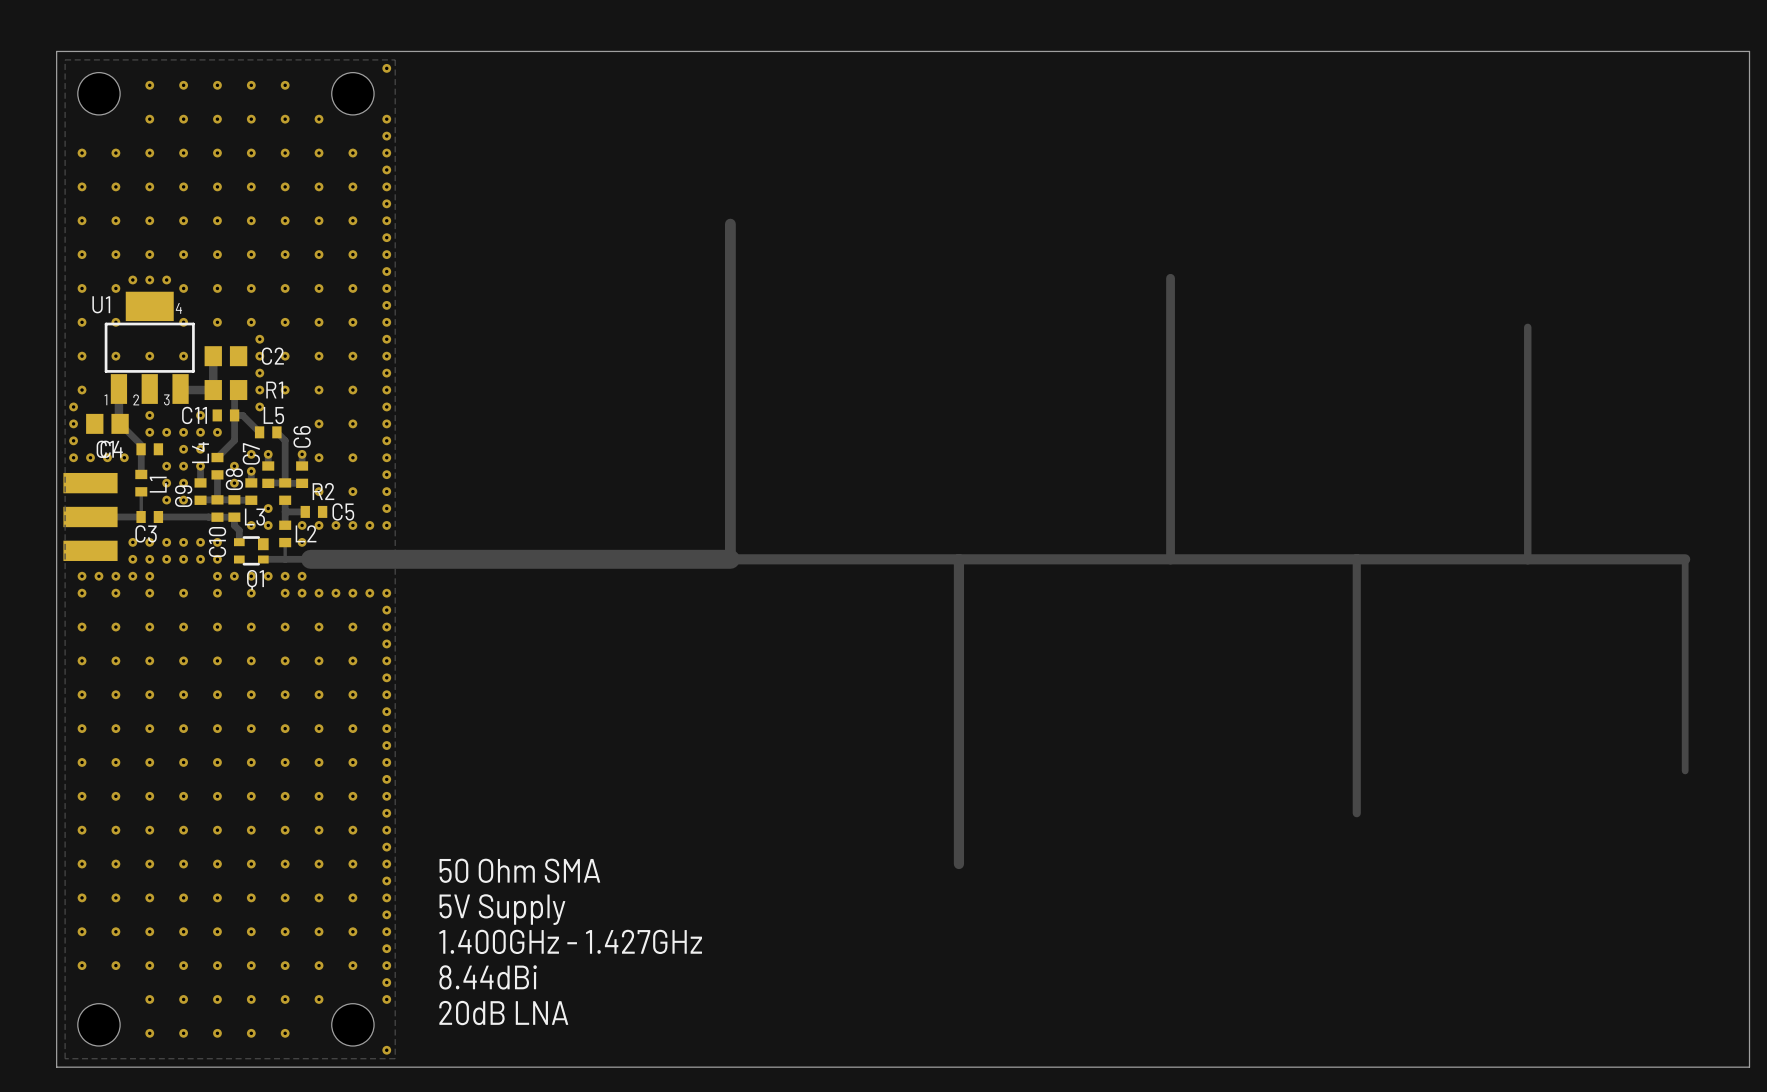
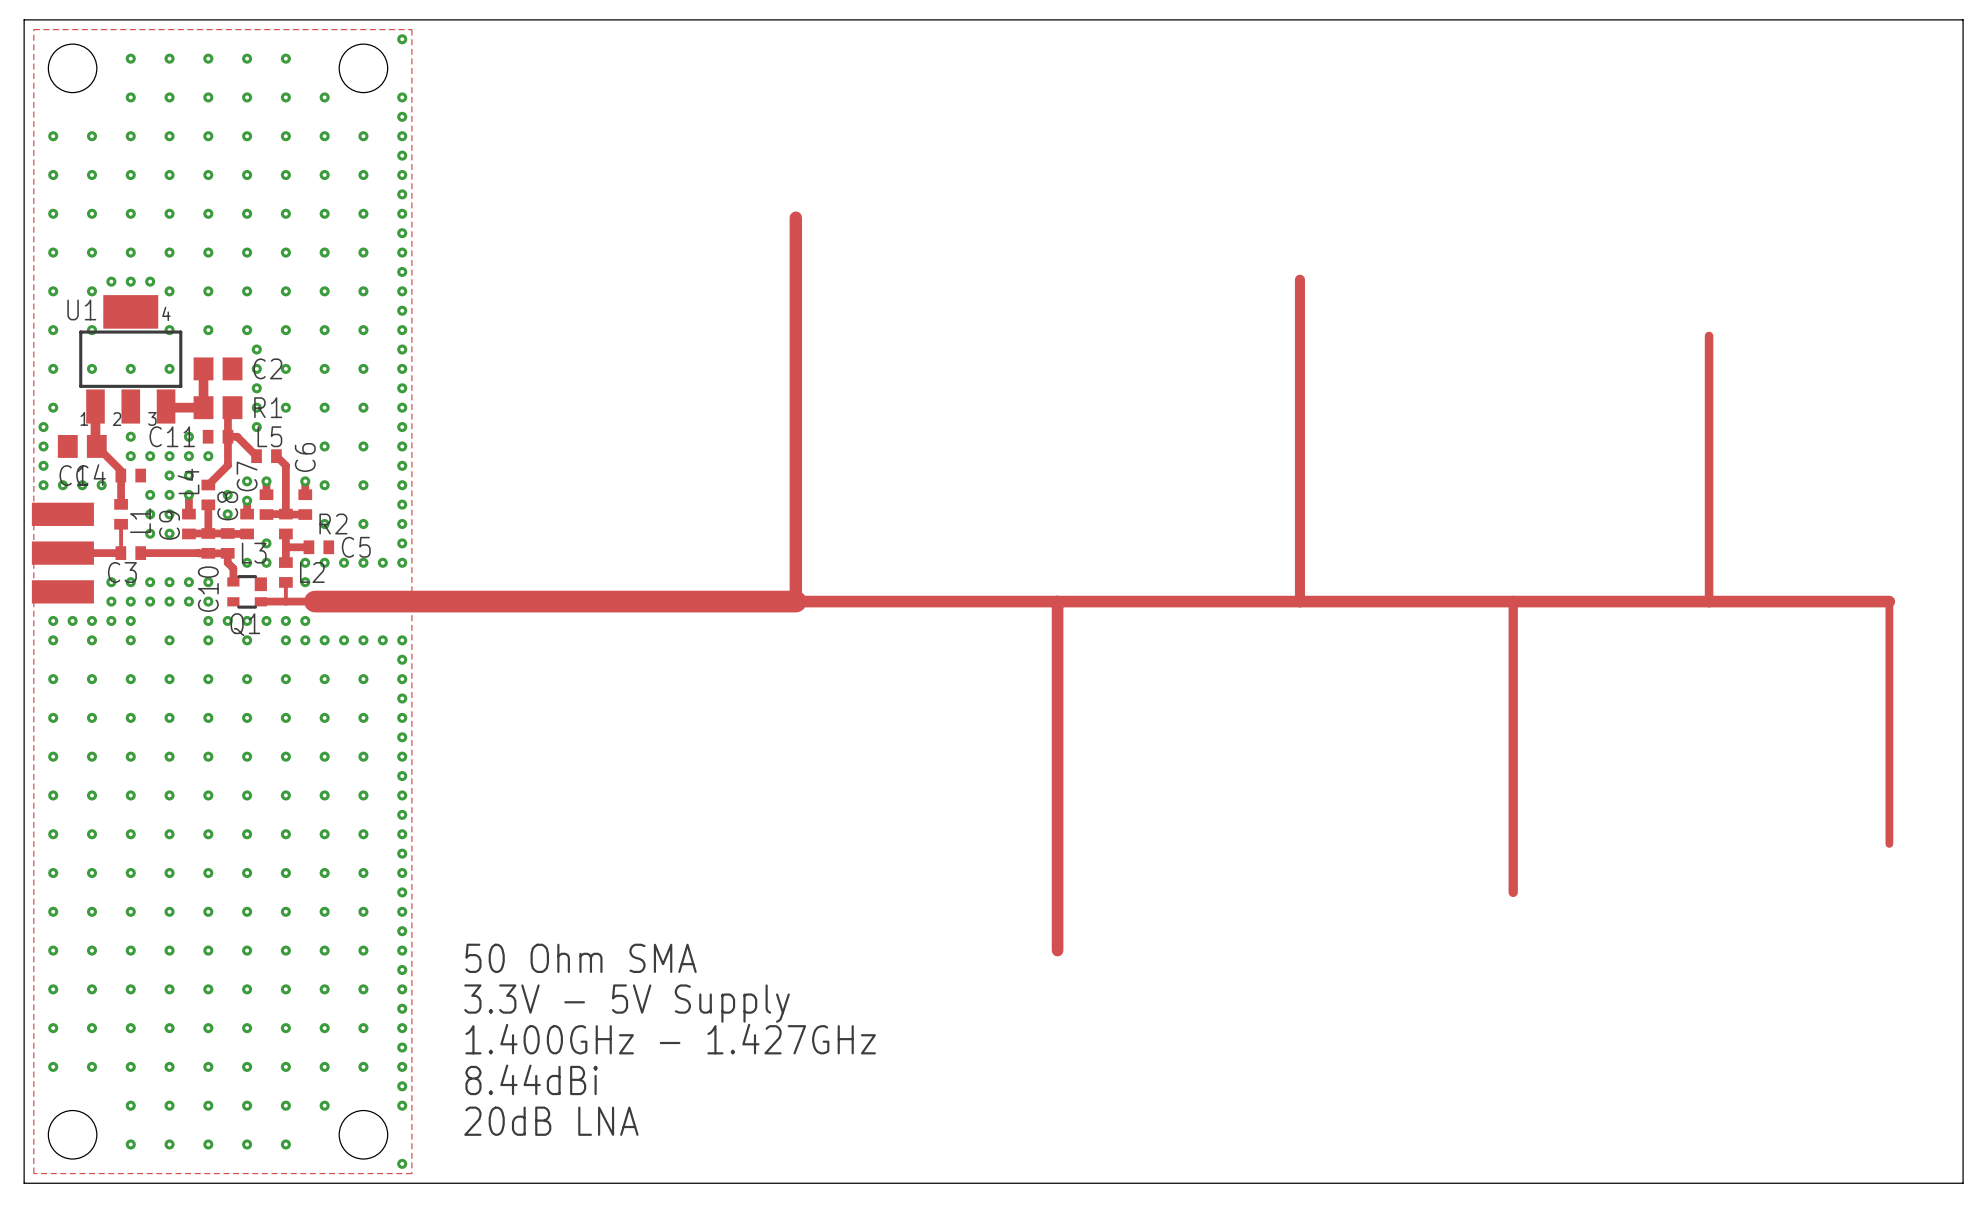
text: 5V Supply (502, 909) -> 3.3V - 5V Supply (627, 1003)

